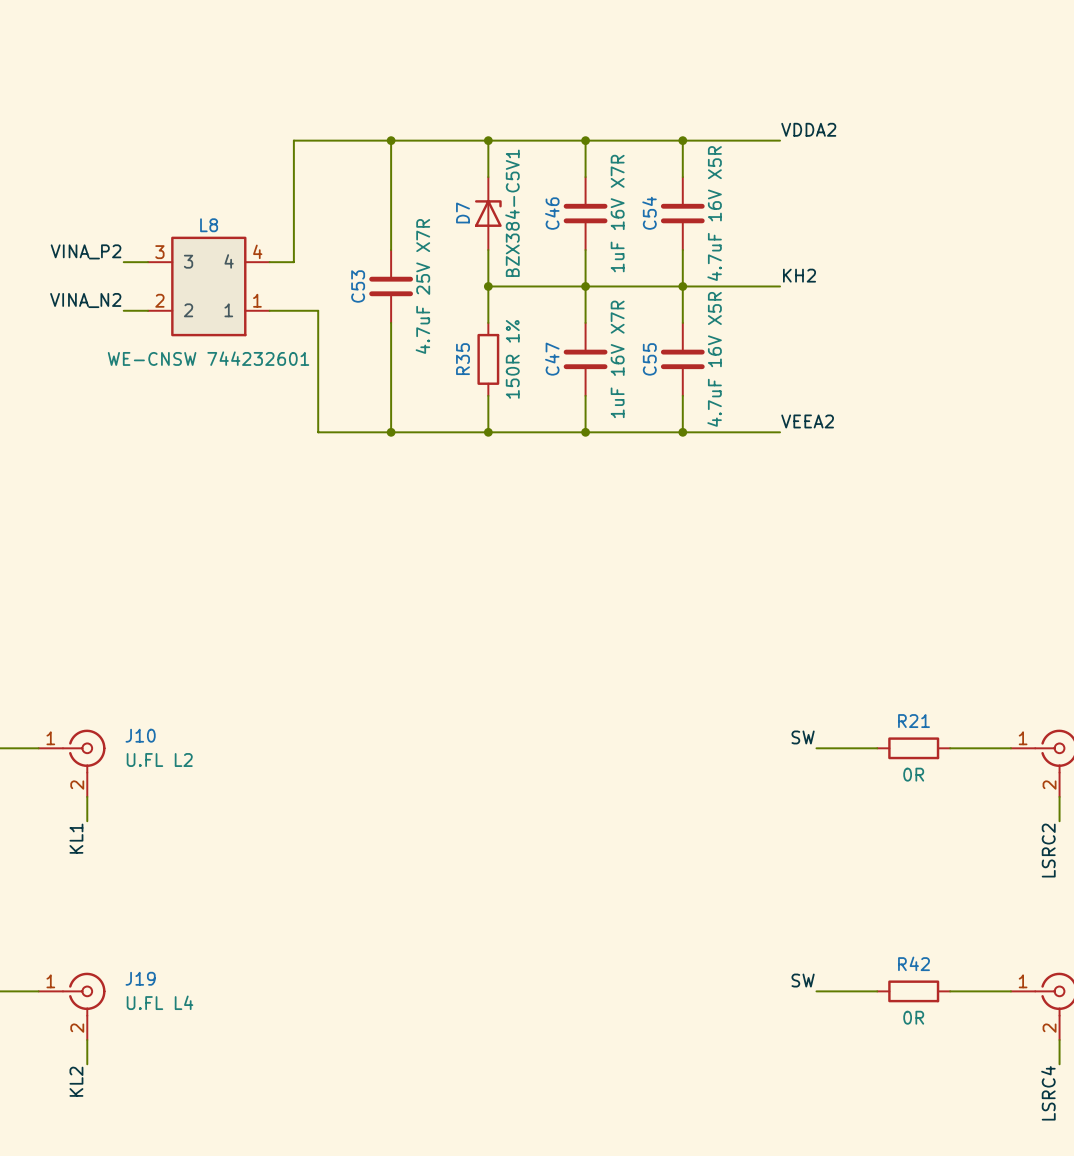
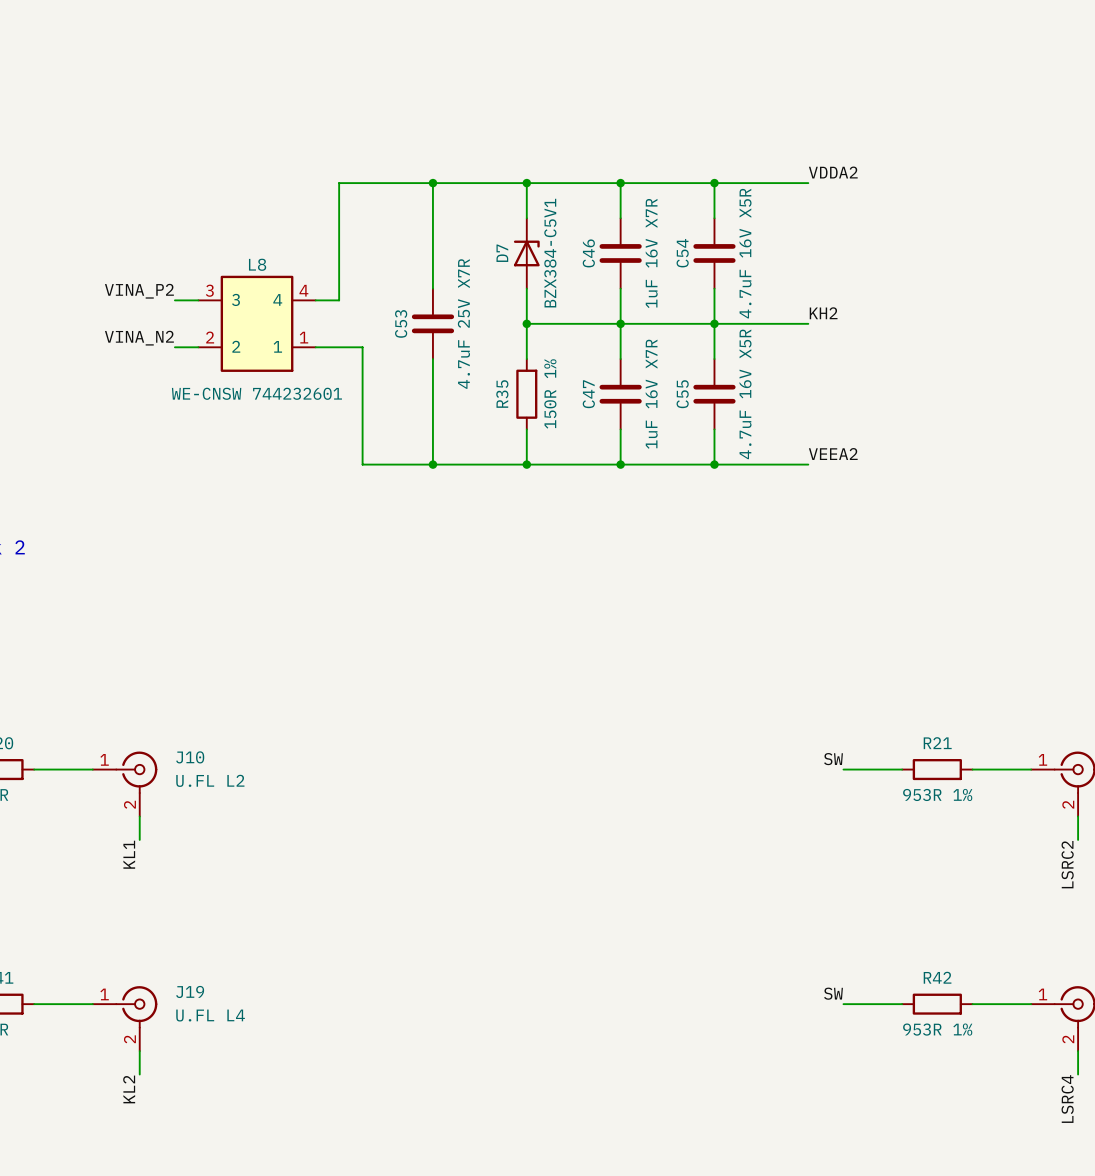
R21 value: 0R (913, 774) -> 953R 1% (937, 794)
R42 value: 0R (913, 1017) -> 953R 1% (937, 1029)

